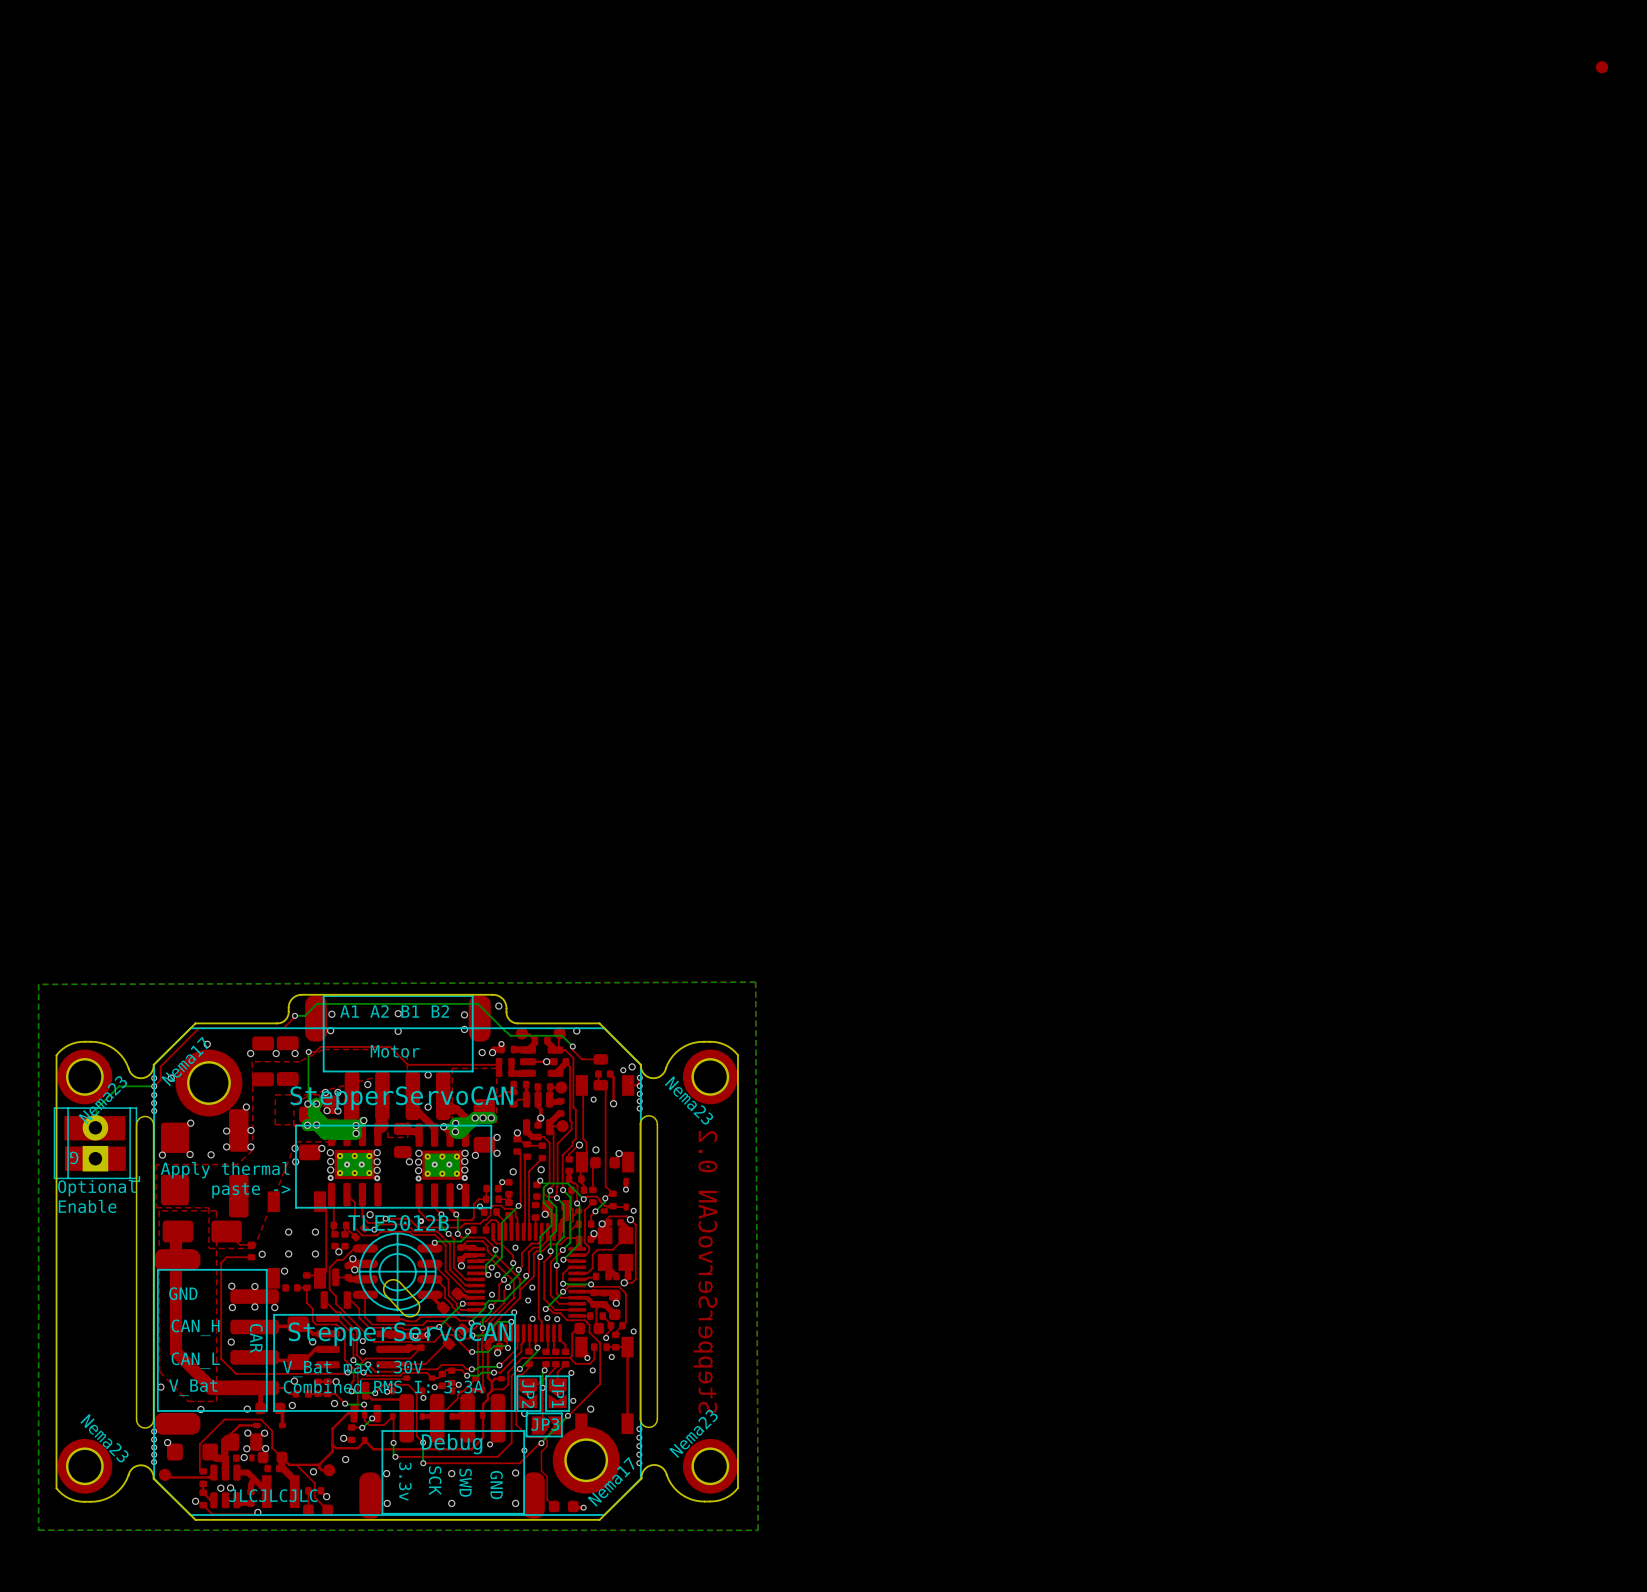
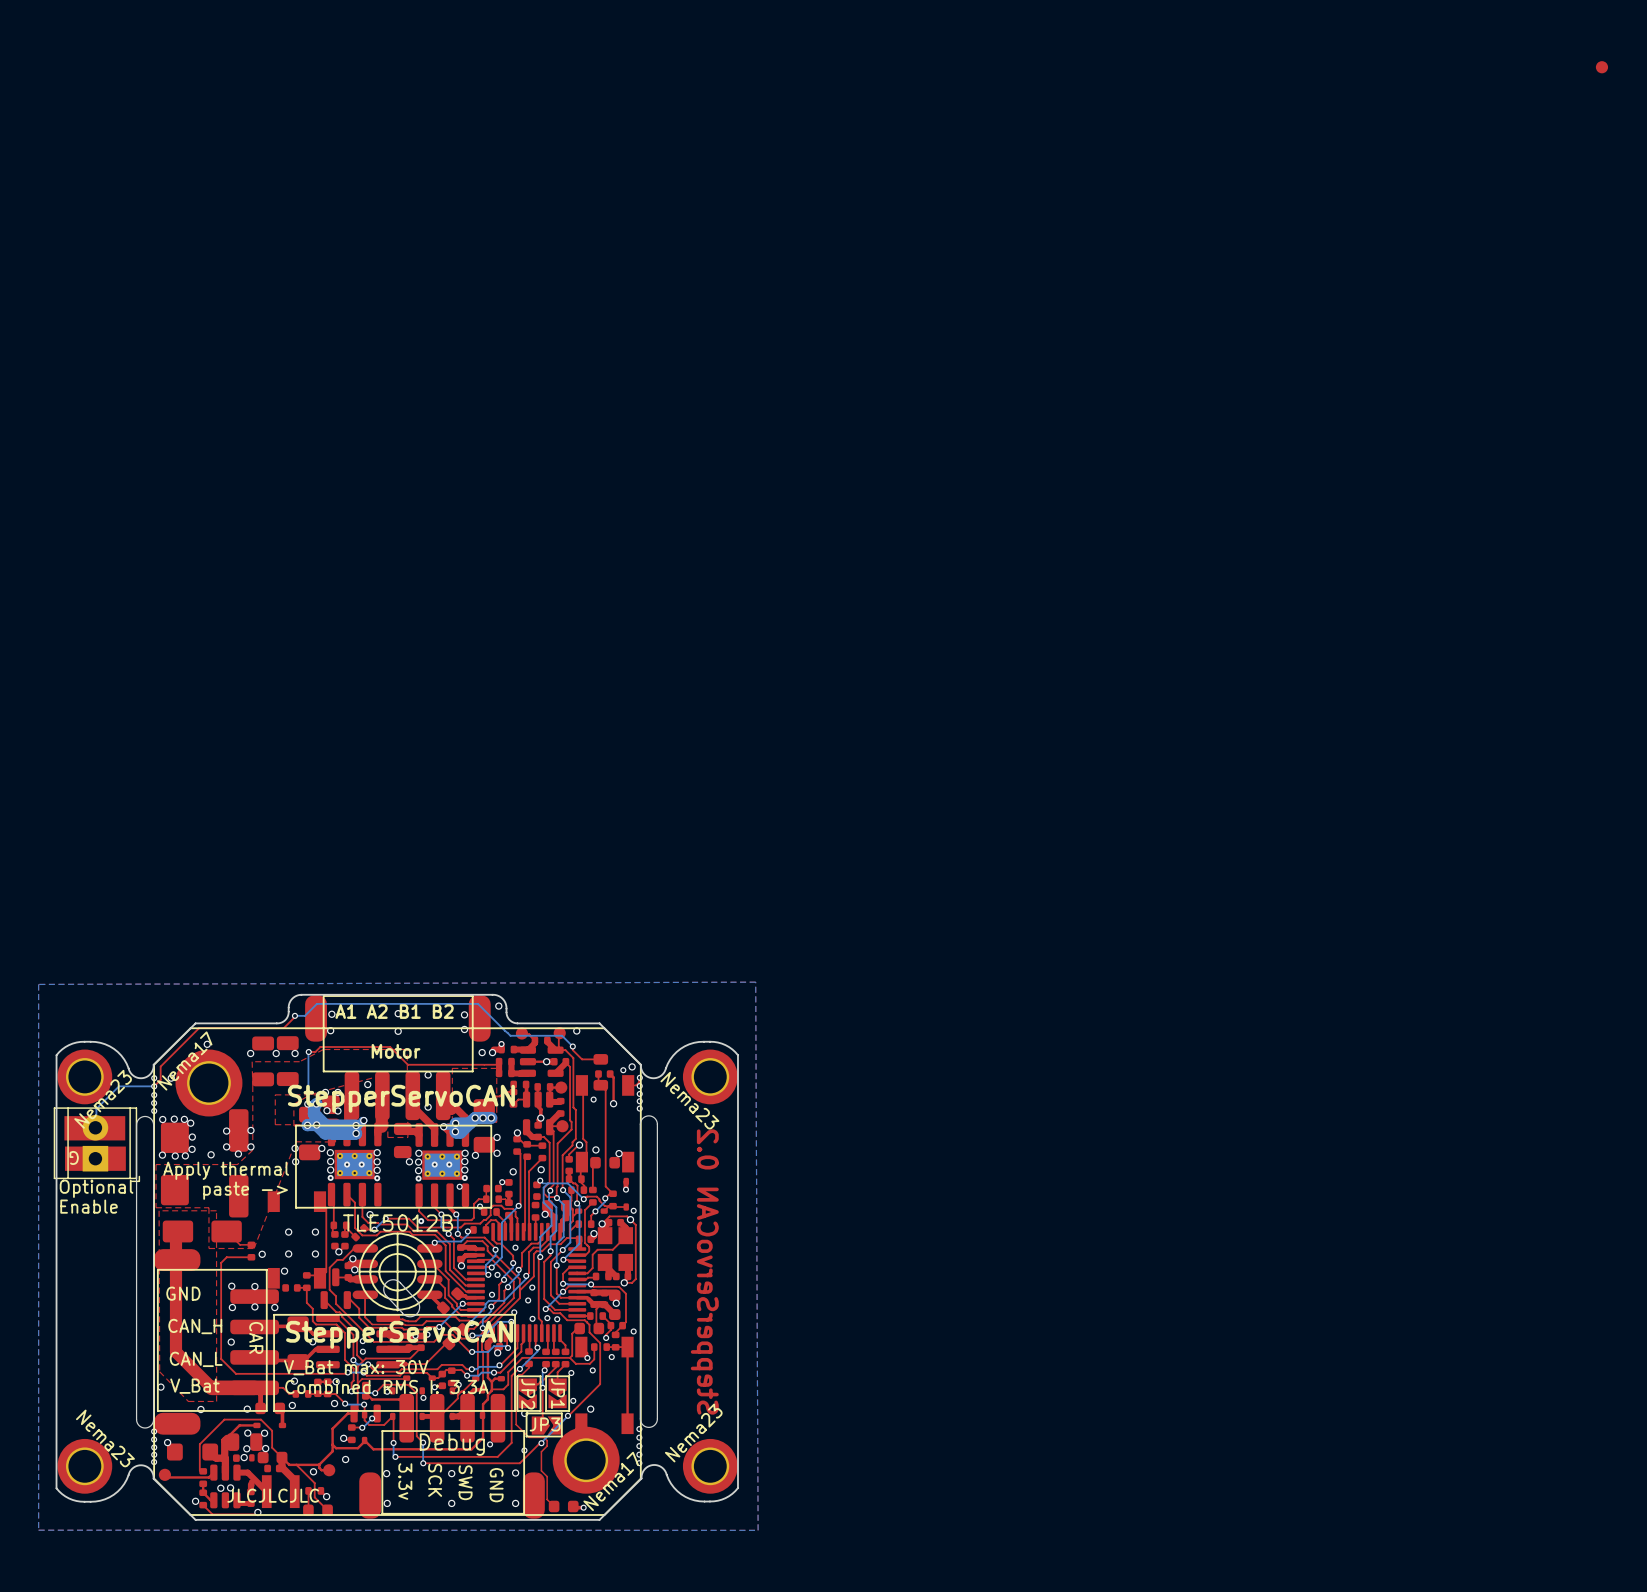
via: (246, 1107) -> none
via: none -> (162, 1119)
via: none -> (174, 1119)
via: none -> (184, 1119)
via: none -> (192, 1137)
via: none -> (192, 1149)
via: none -> (238, 1153)
via: (190, 1154) -> none
via: none -> (185, 1155)
via: none -> (175, 1156)

